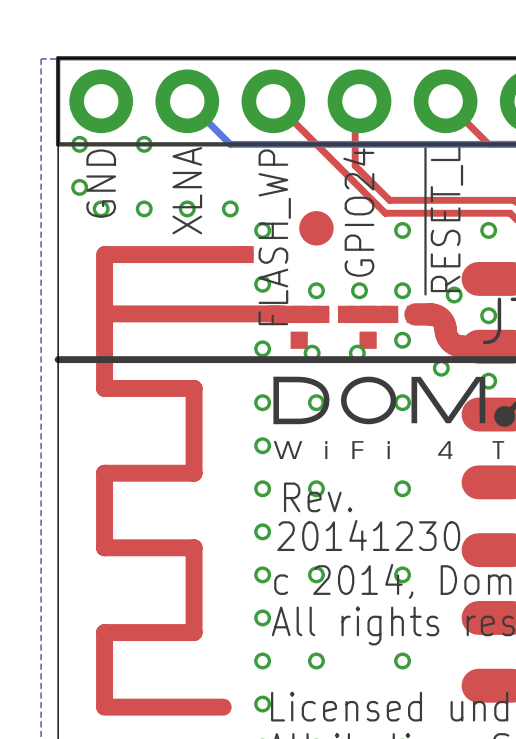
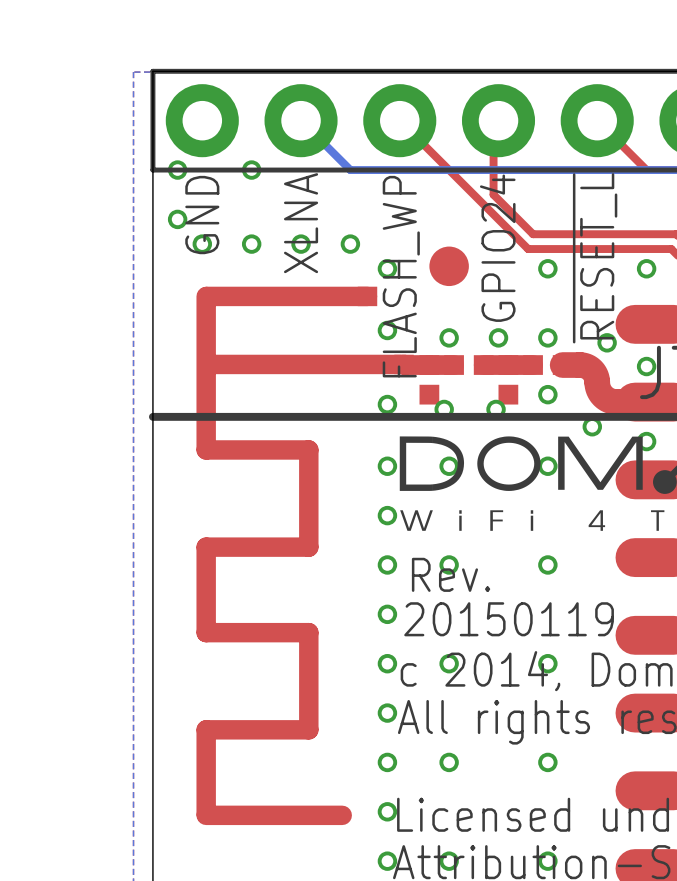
text: 20141230 (368, 535) -> 20150119 (509, 619)

